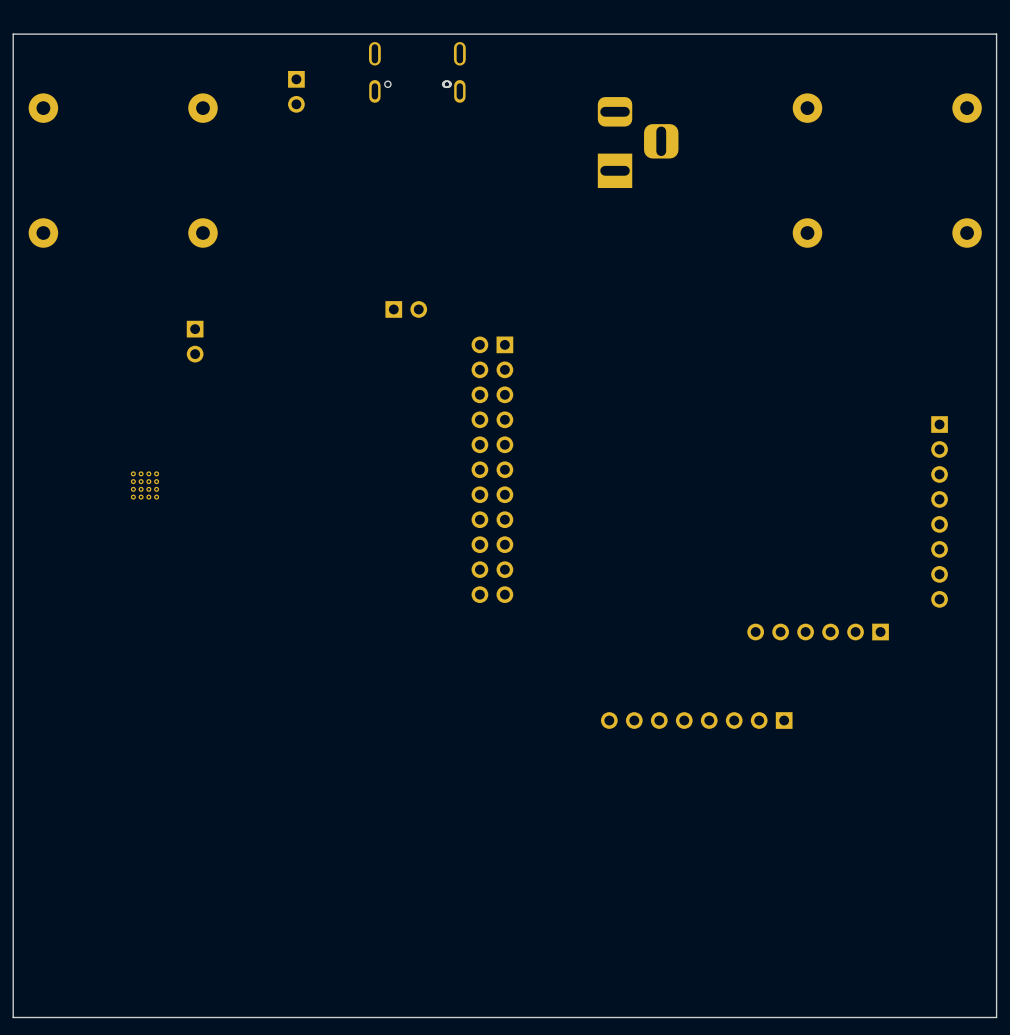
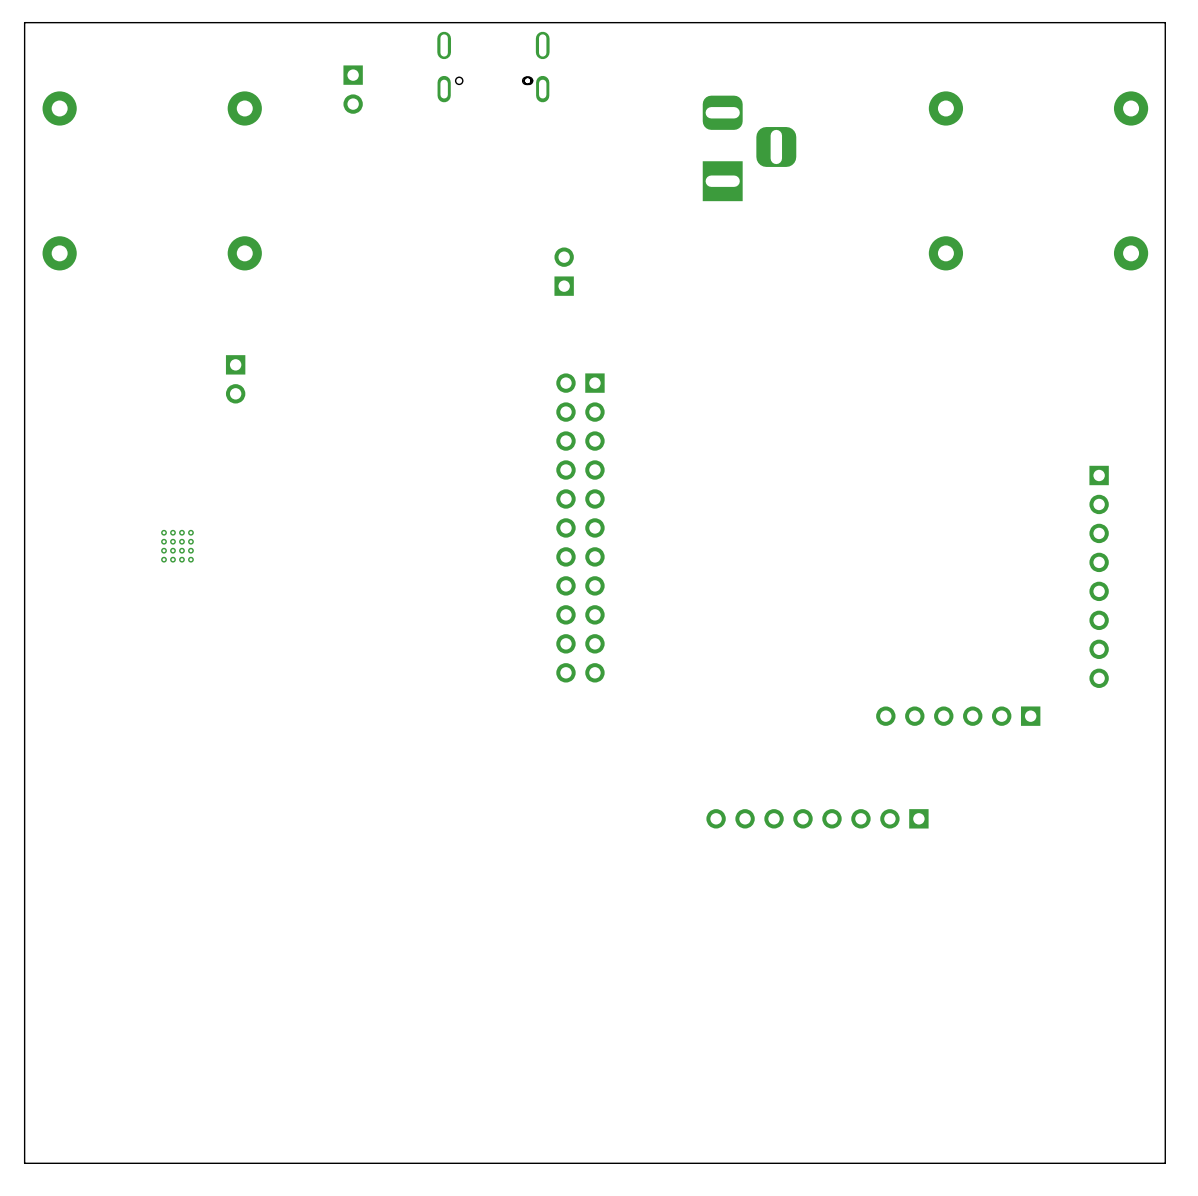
part rotation: 0° (406, 309) -> 90° counterclockwise (564, 271)
part position: (406, 309) -> (564, 271)

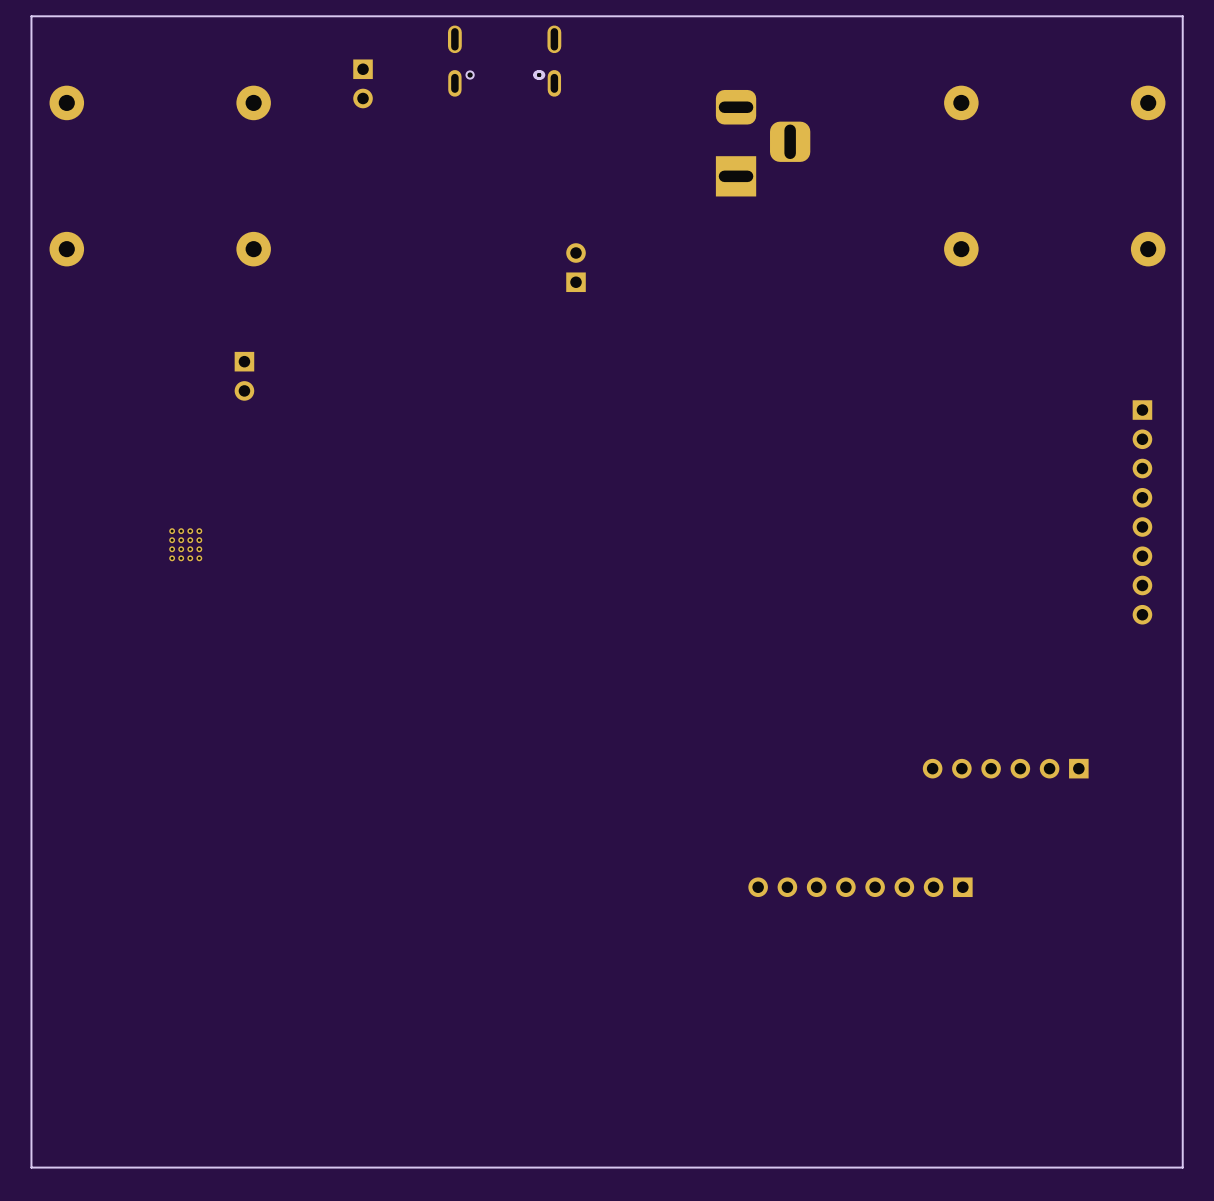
part: (580, 527) -> none
part position: (1099, 576) -> (1142, 512)
part position: (958, 716) -> (1005, 768)
part position: (817, 818) -> (860, 887)

